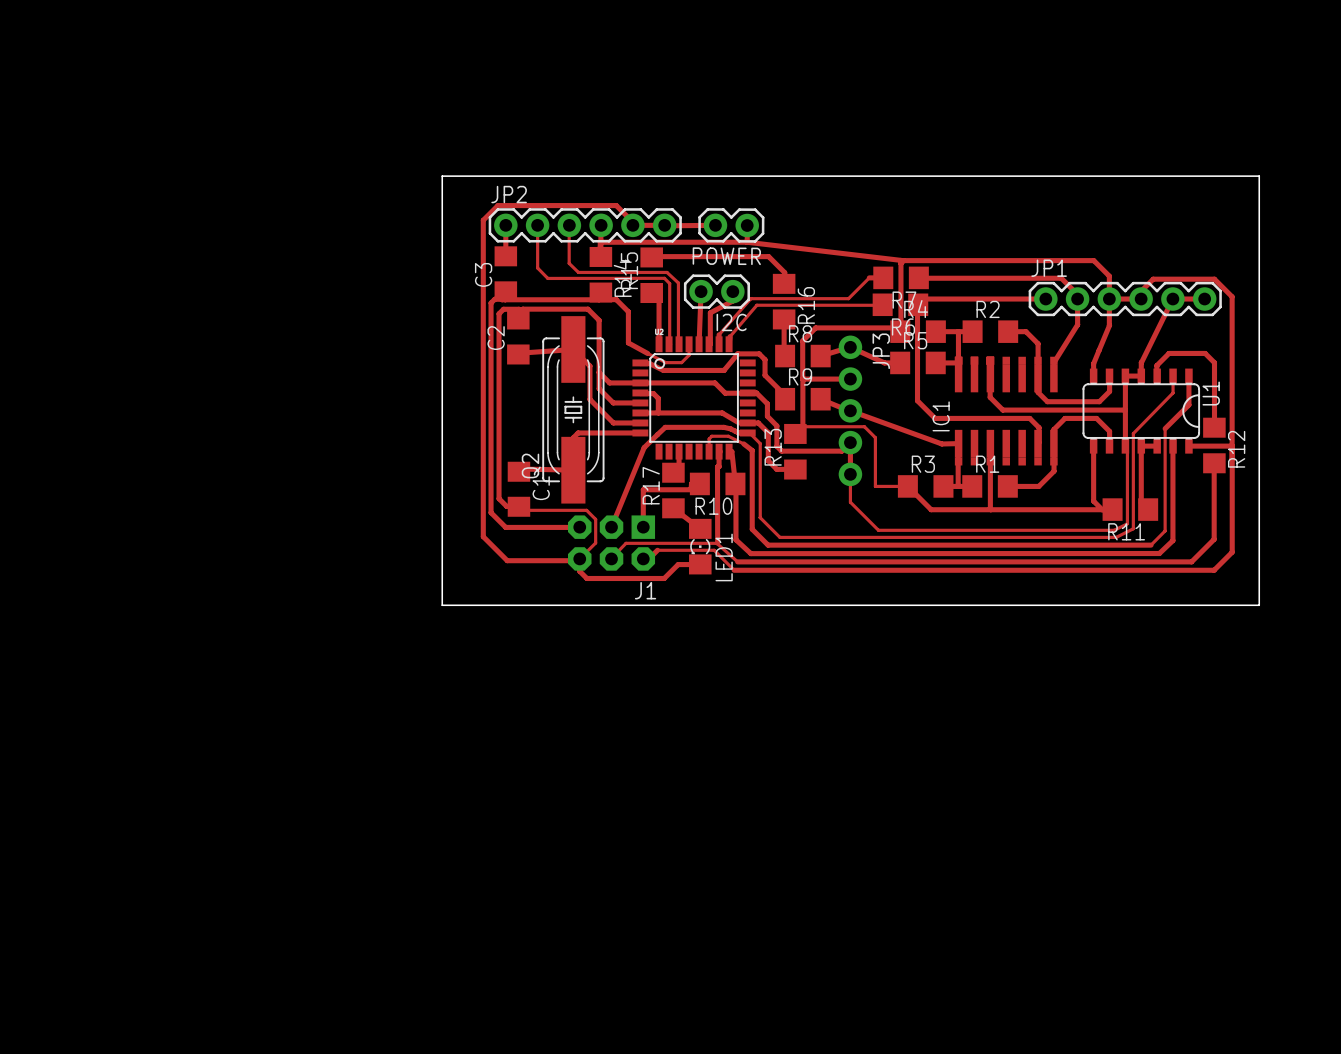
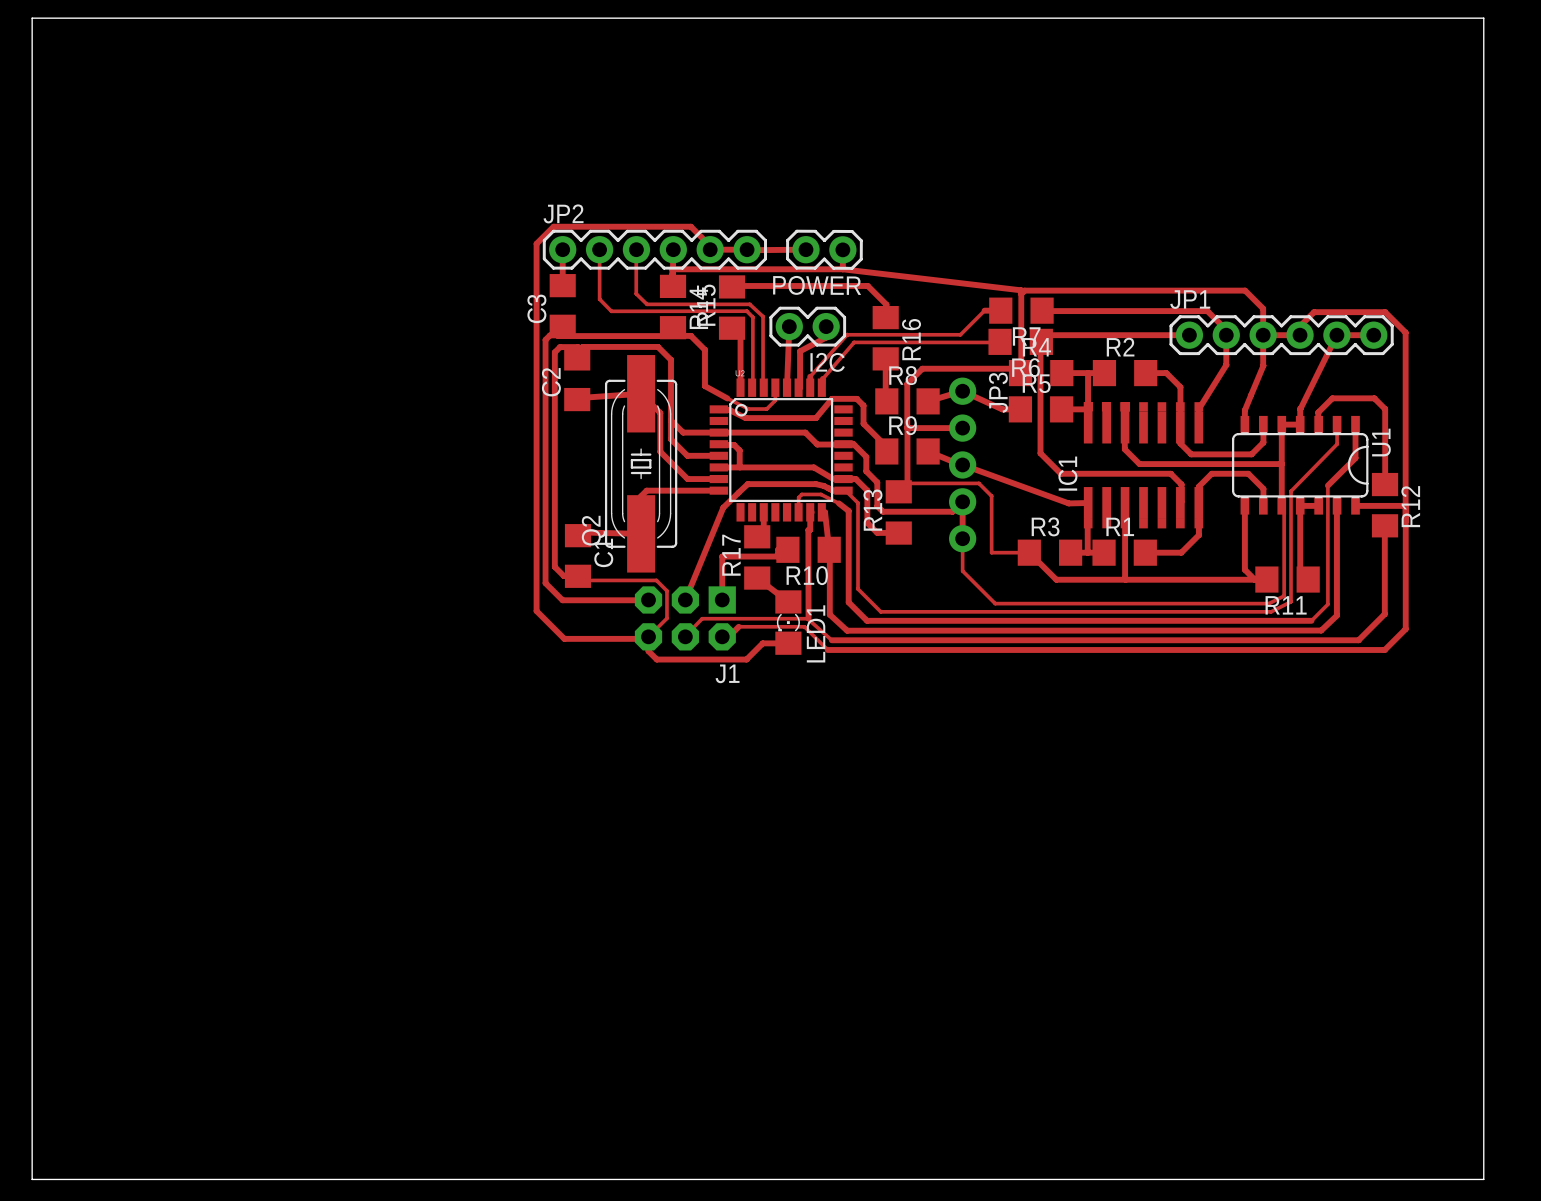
board edge: none -> (32, 18) (1483, 18) (1483, 1179) (32, 1179) (32, 18)
board edge: (442, 176) (1259, 176) (1259, 605) (442, 605) (442, 176) -> none

